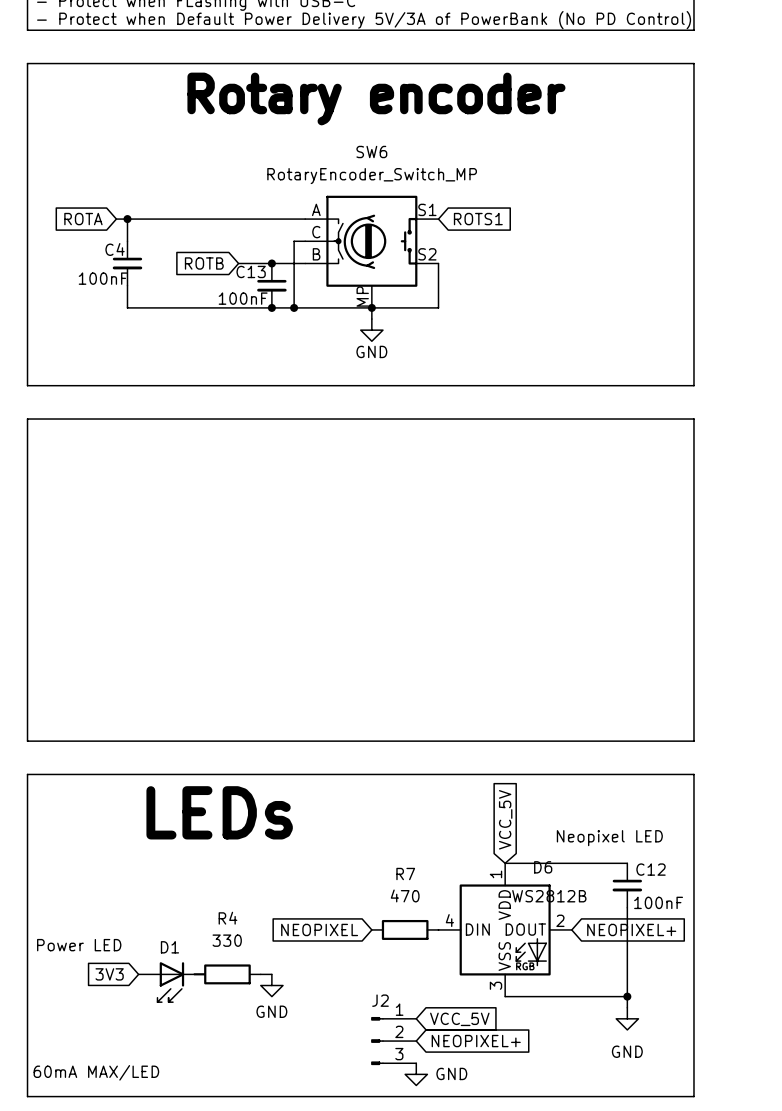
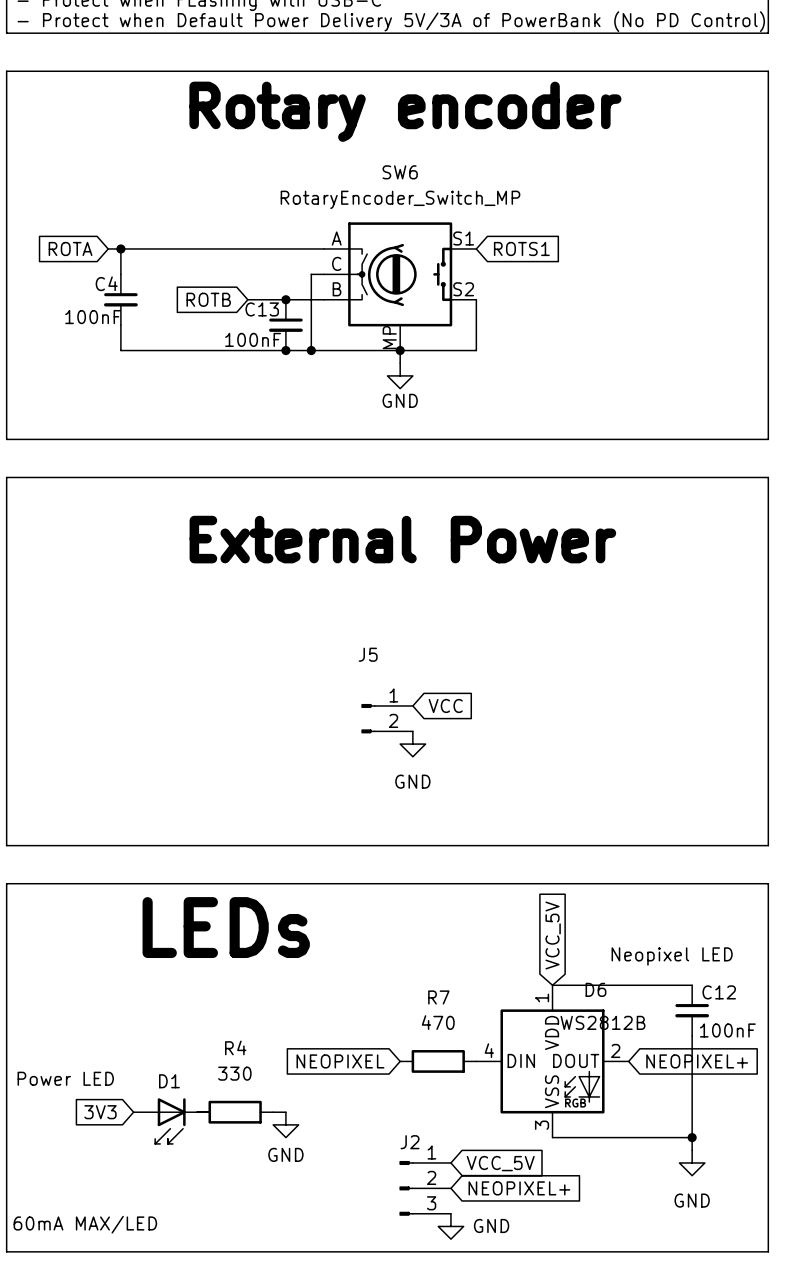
text: none -> External Power (402, 539)
global label: none -> VCC (445, 705)
J5: none -> (387, 718)
power symbol: none -> GND (412, 744)

